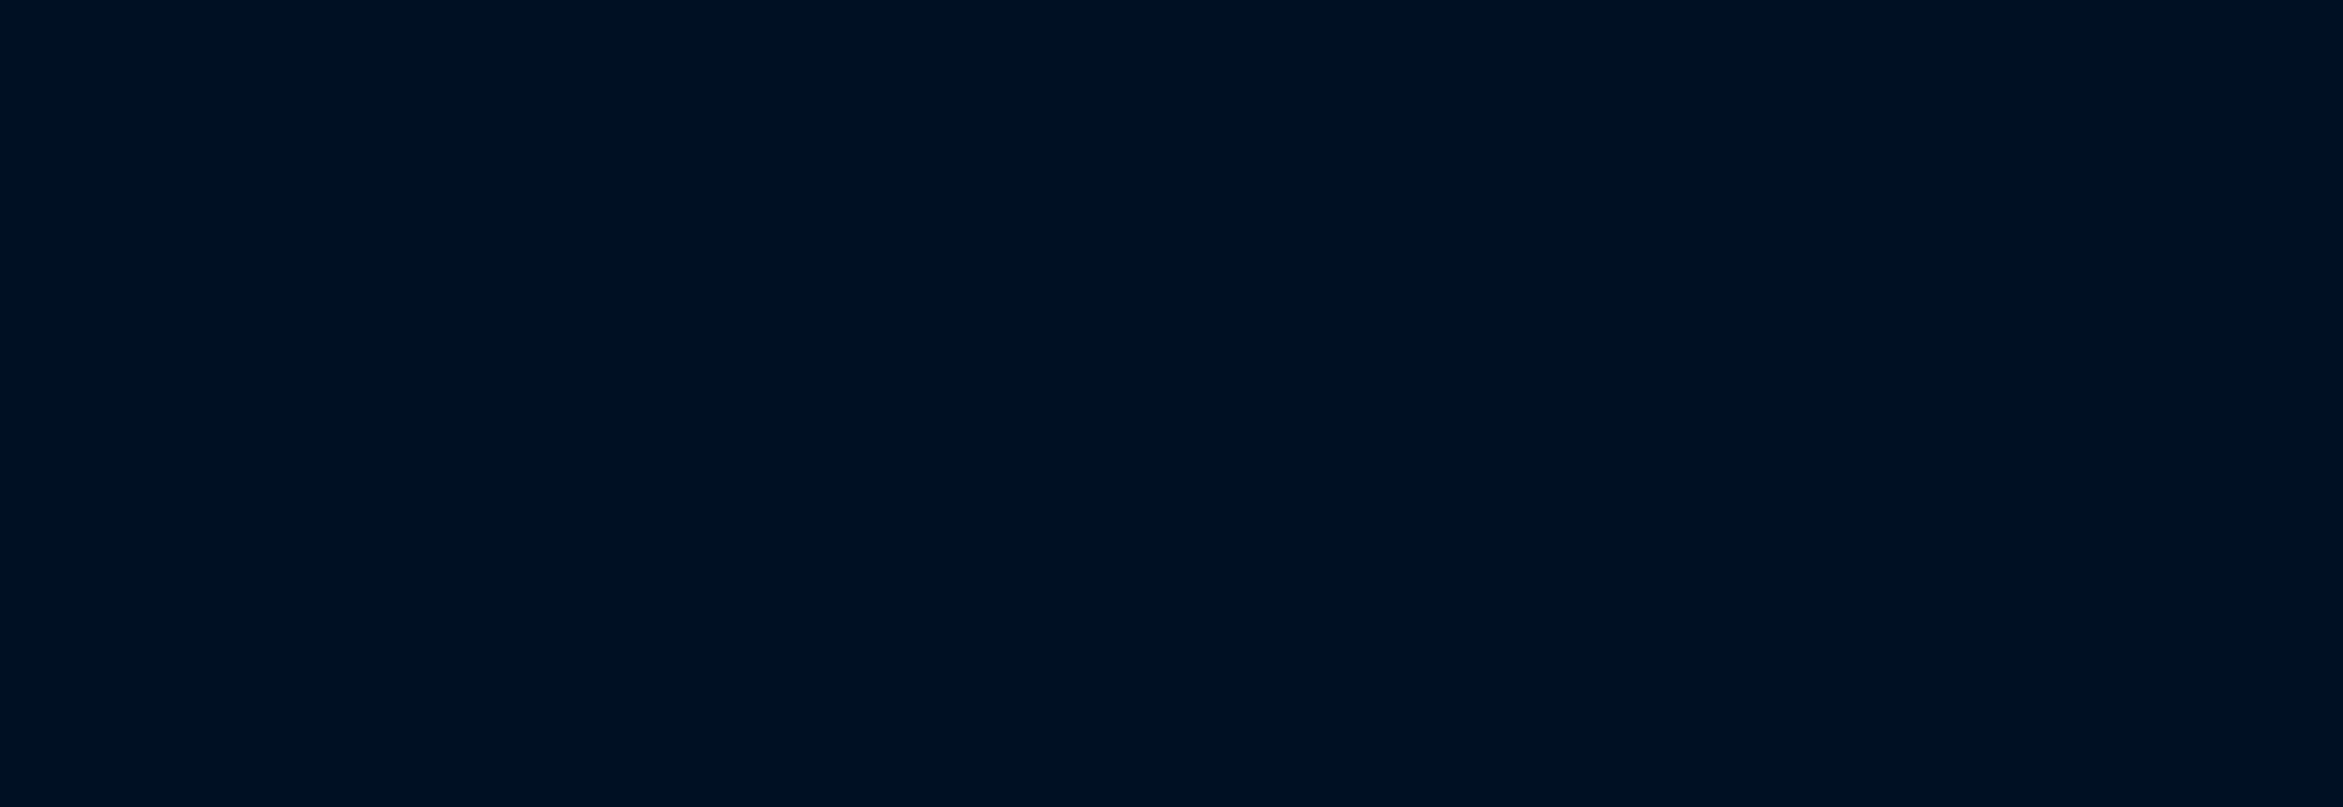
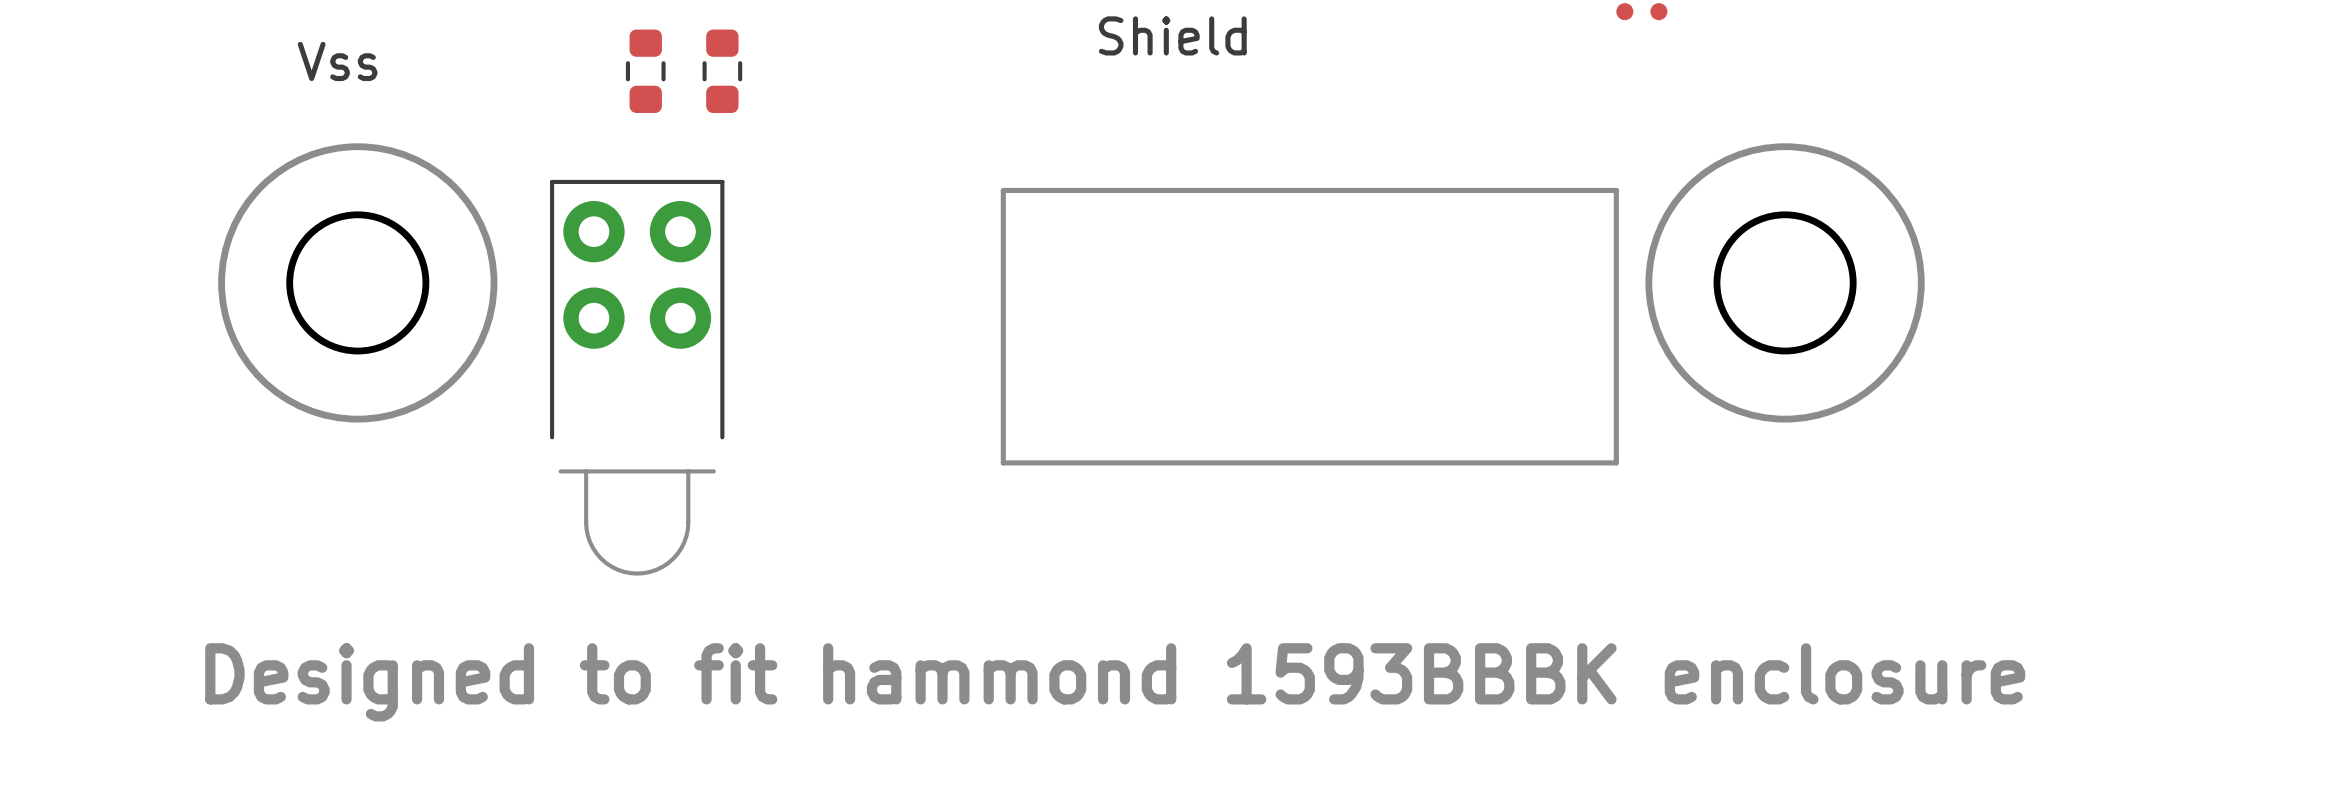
part: none -> (1641, 11)
text: none -> Shield (1172, 35)
text: none -> Vss (337, 61)
part: none -> (645, 71)
part: none -> (722, 71)
drawing: none -> [218, 143, 498, 423]
drawing: none -> [1645, 143, 1925, 423]
line: none -> (1003, 190) (1616, 190) (1616, 462) (1003, 462) (1003, 190)
round board edge: none -> [286, 211, 430, 355]
round board edge: none -> [1713, 211, 1857, 355]
part: none -> (637, 377)
text: none -> Designed to fit hammond 1593BBBK enclosure (1115, 682)

